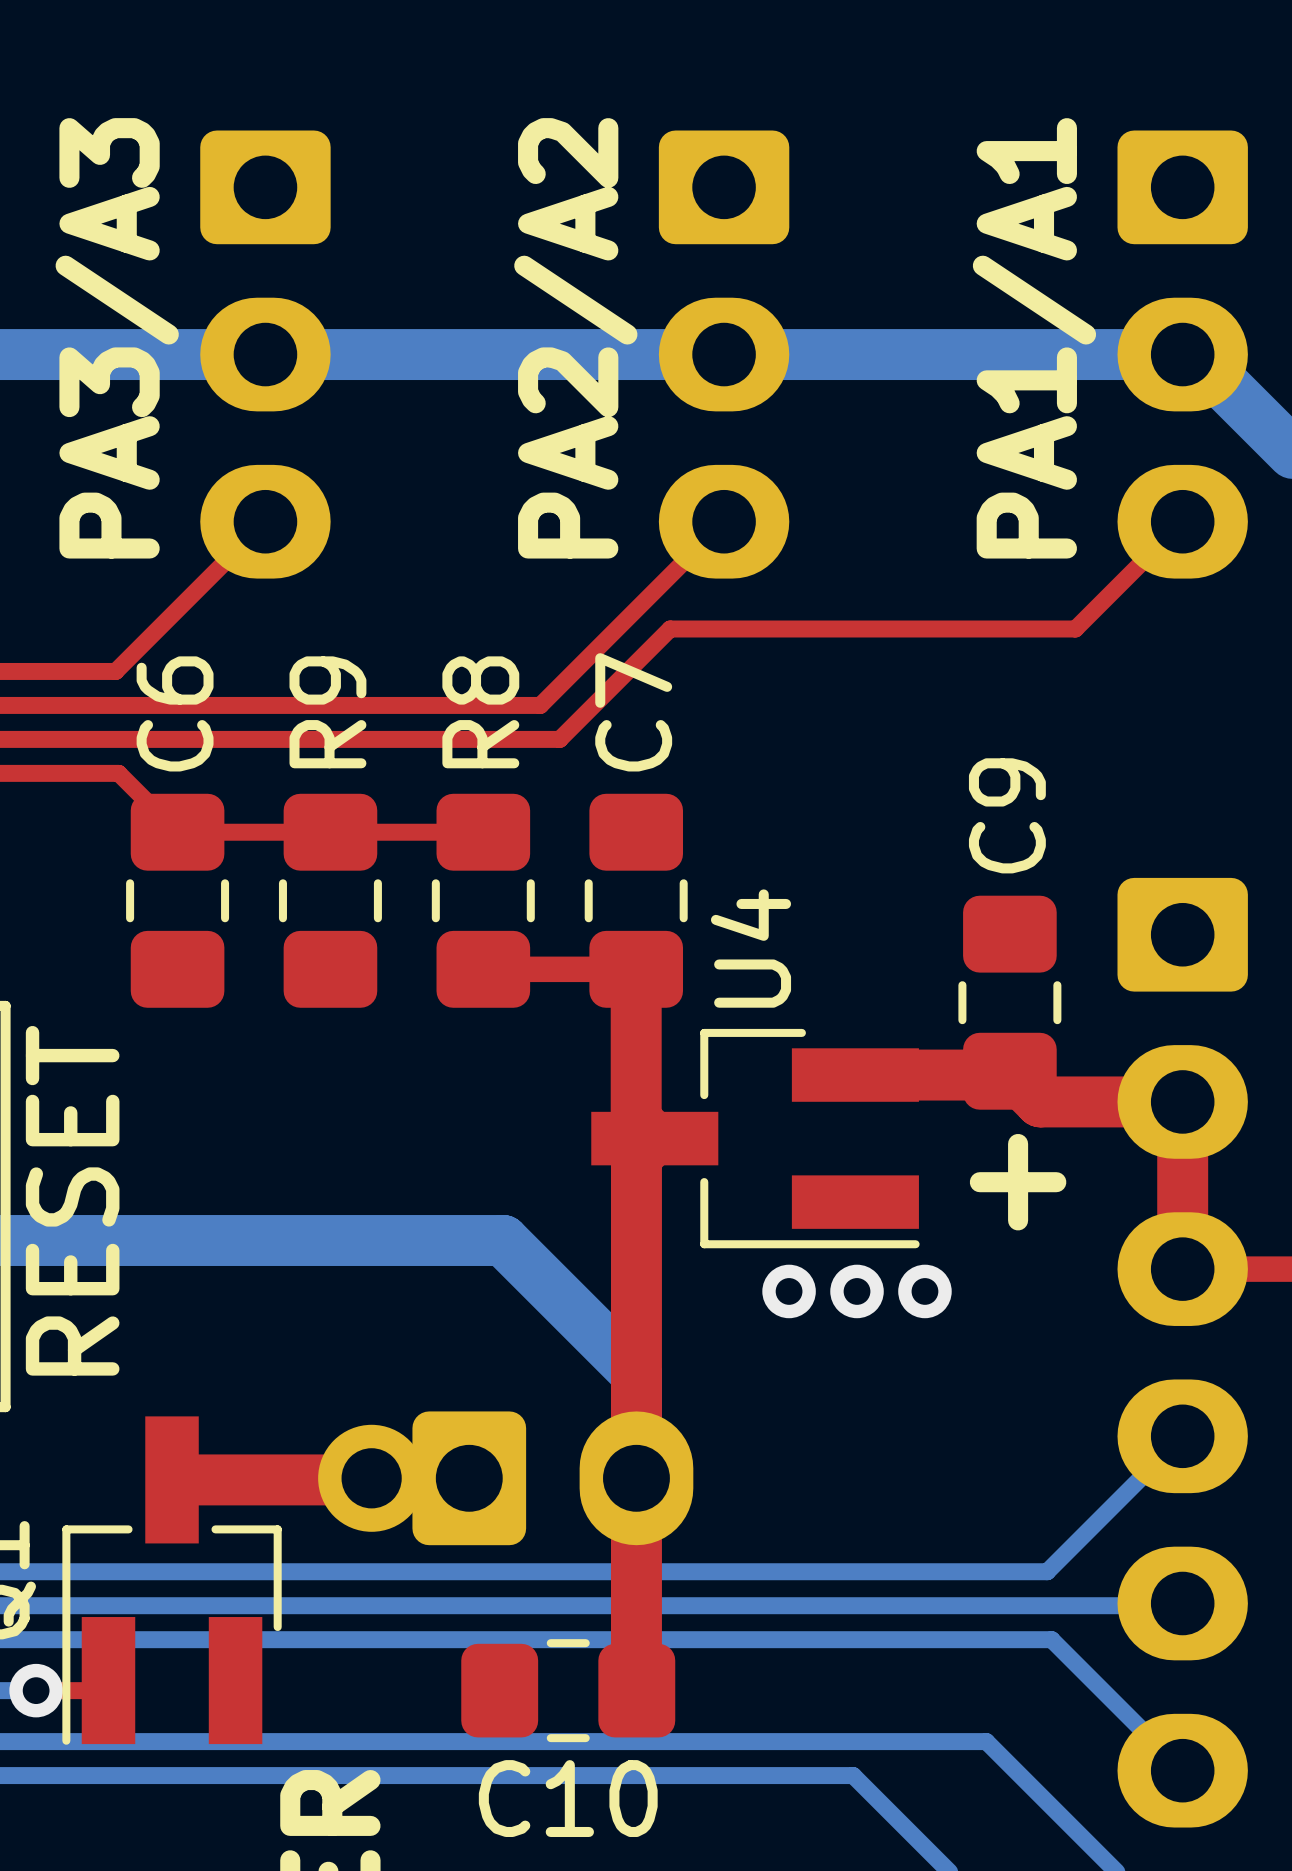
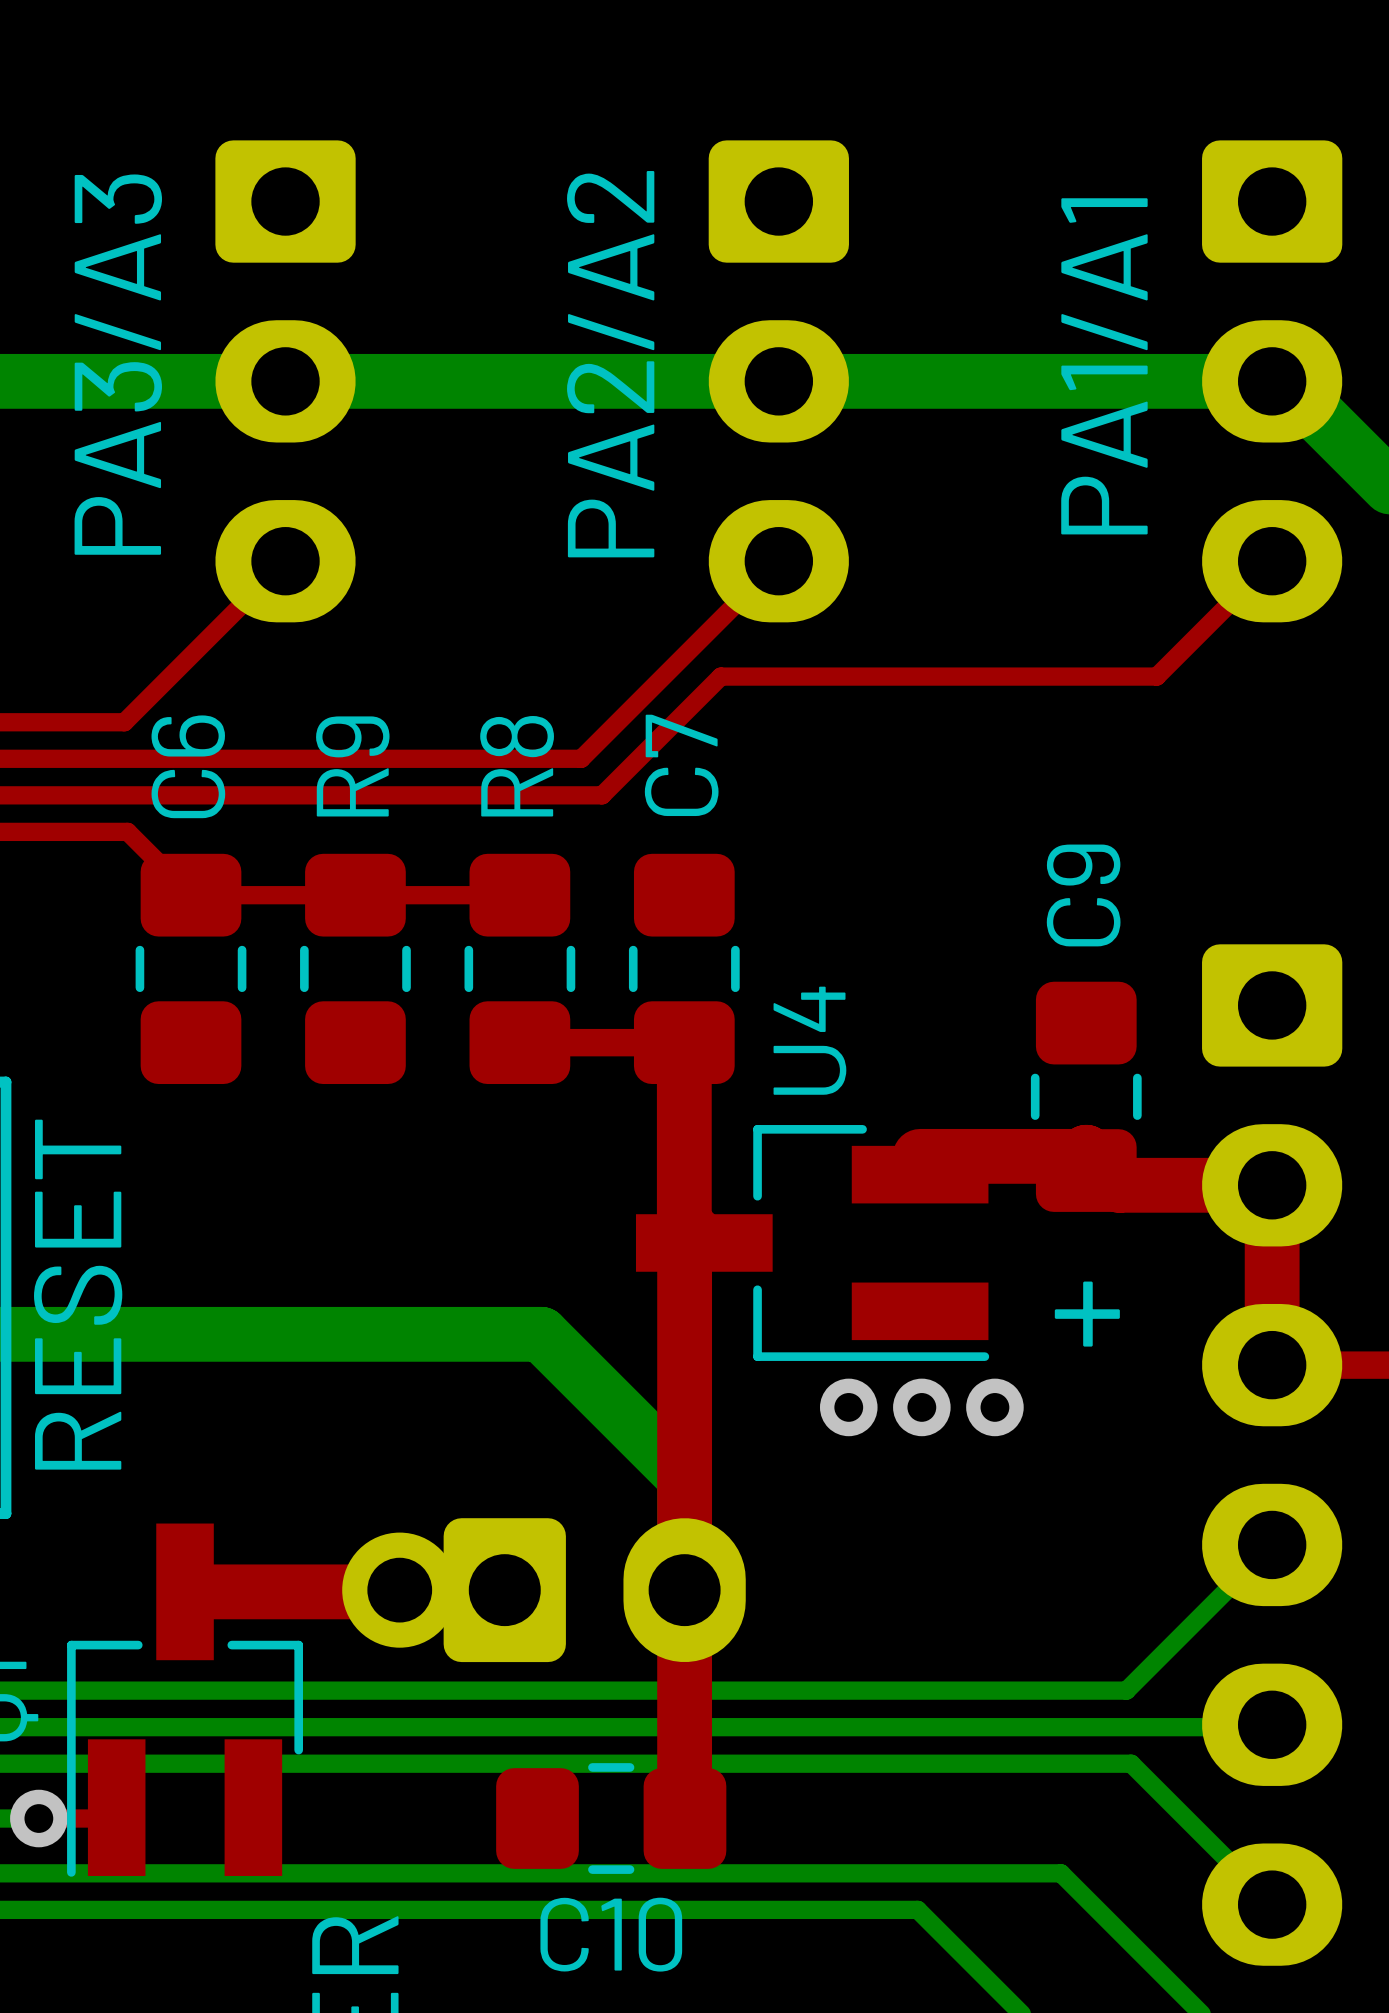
C9 position: (1009, 1002) -> (1086, 1096)
U4 position: (755, 1138) -> (812, 1242)
via position: (789, 1291) -> (848, 1407)
via position: (857, 1291) -> (921, 1407)
via position: (924, 1291) -> (994, 1407)

